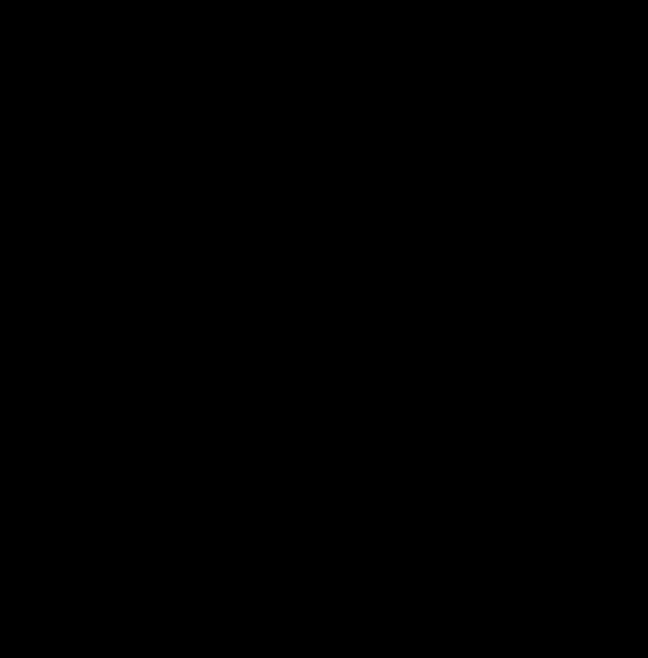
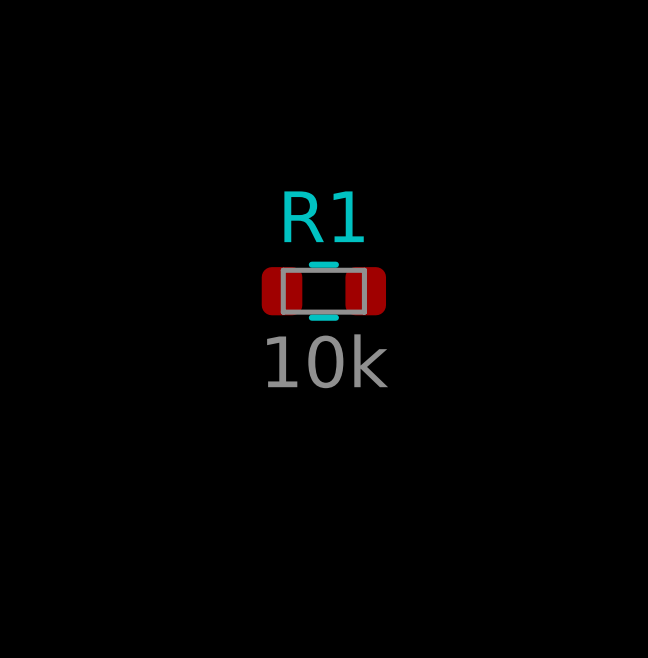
R1: none -> 10k (323, 291)

